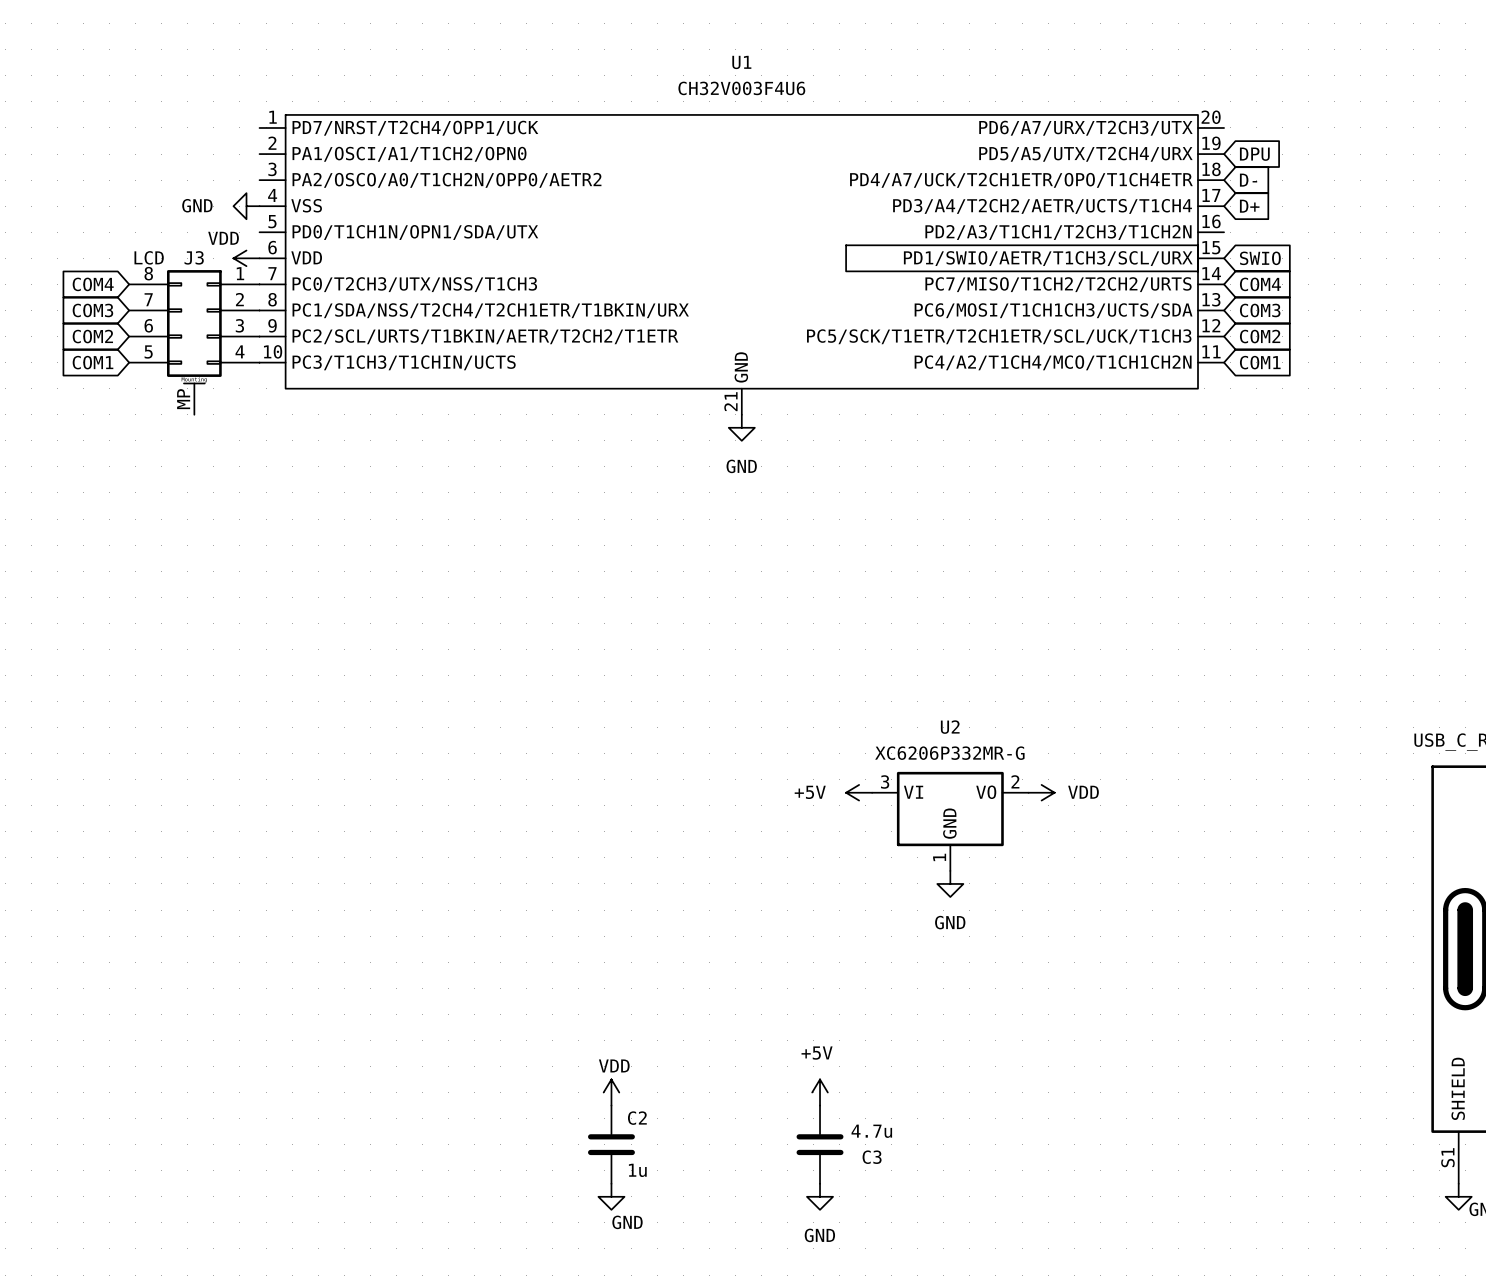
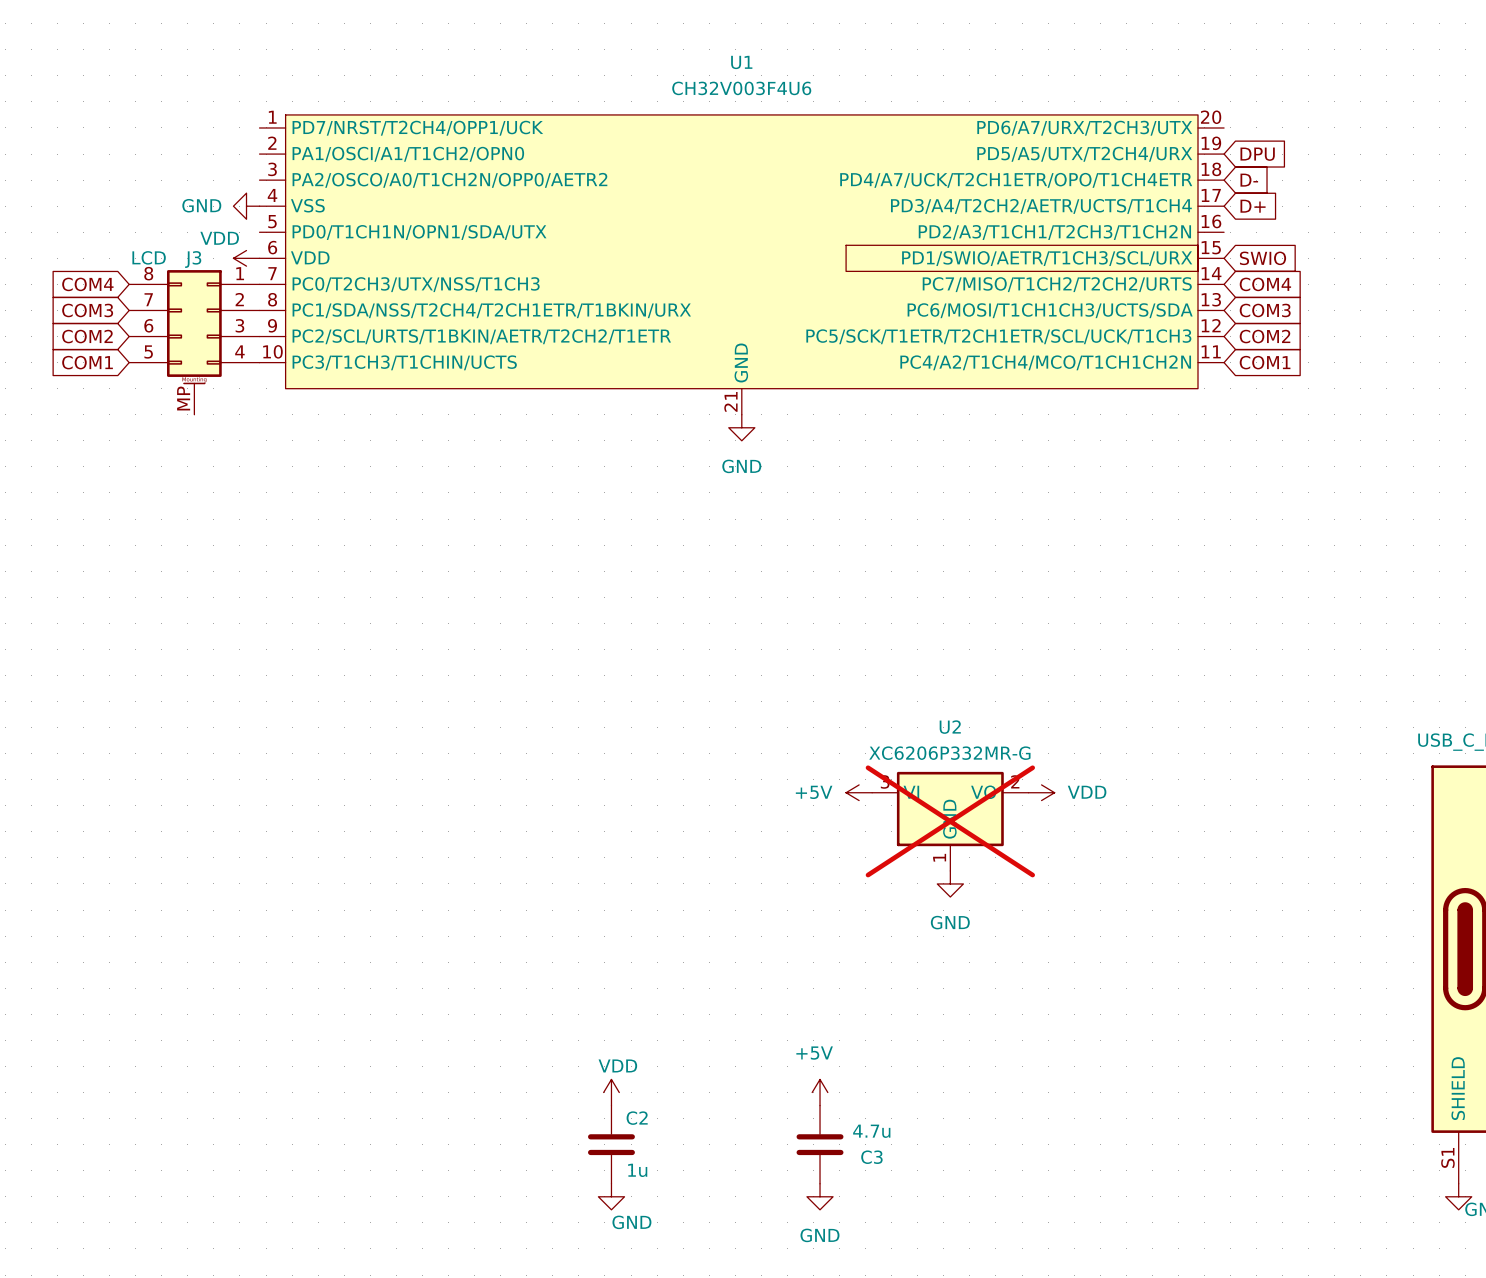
U2 do-not-place cross: none -> (950, 821)

